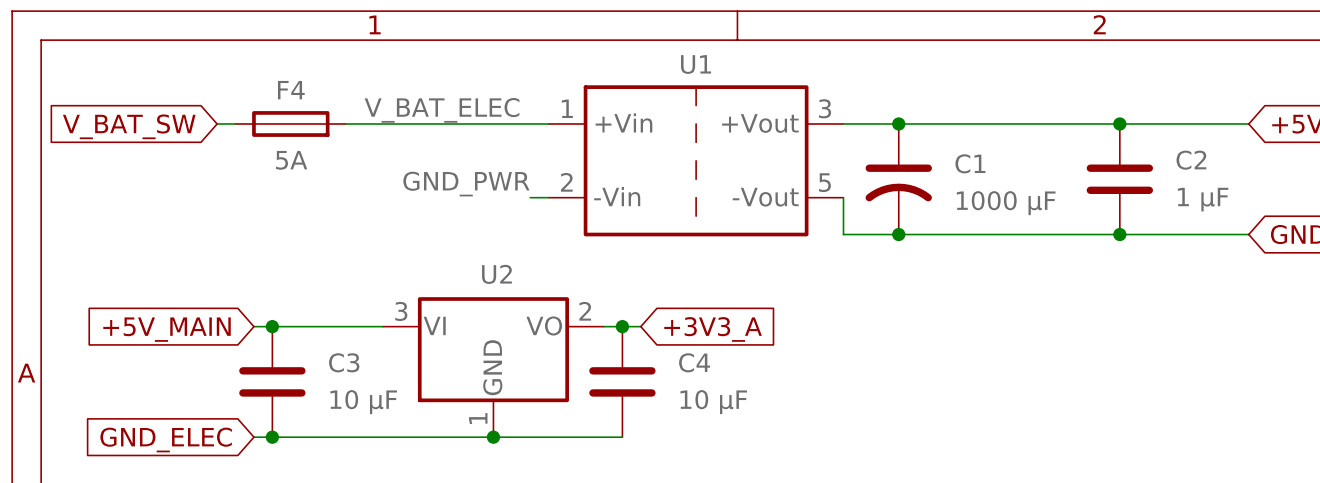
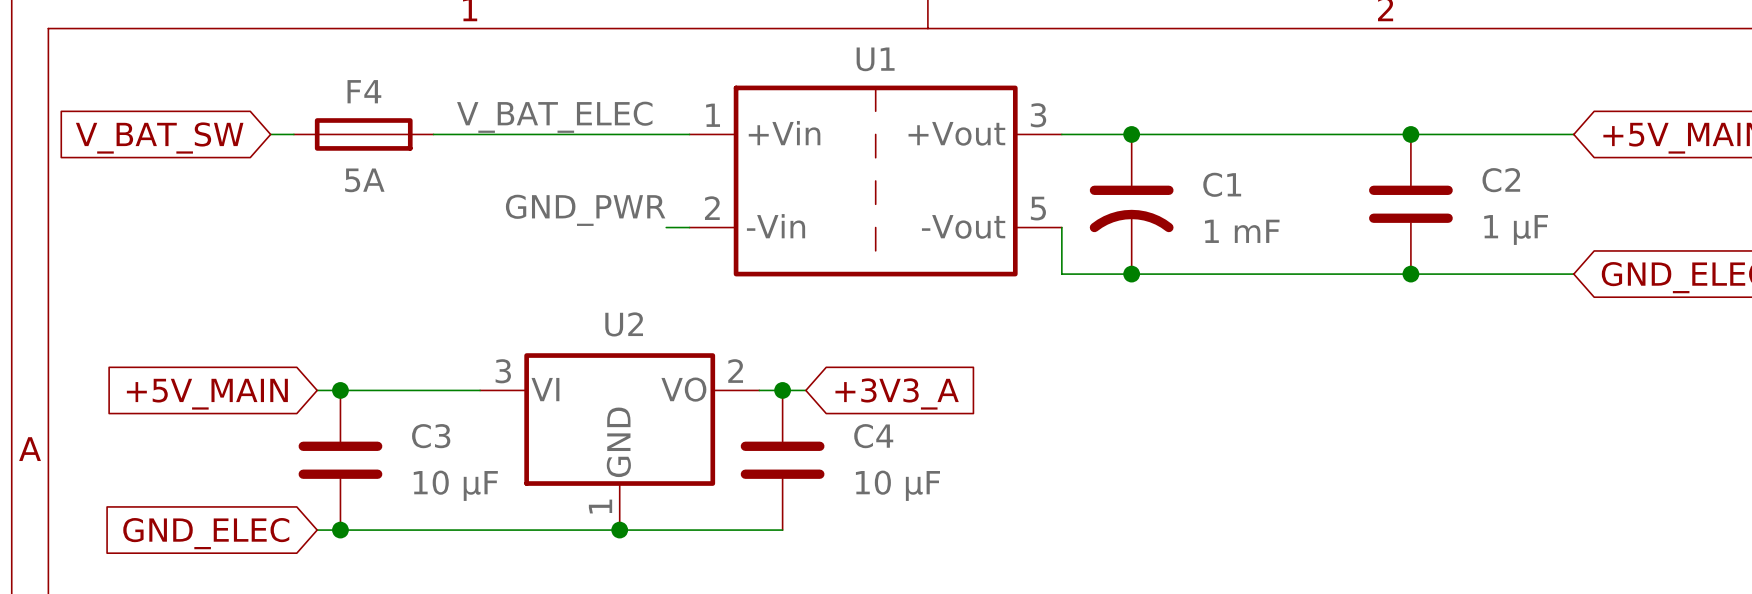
C1 value: 1000 µF (1006, 203) -> 1 mF (1242, 231)

